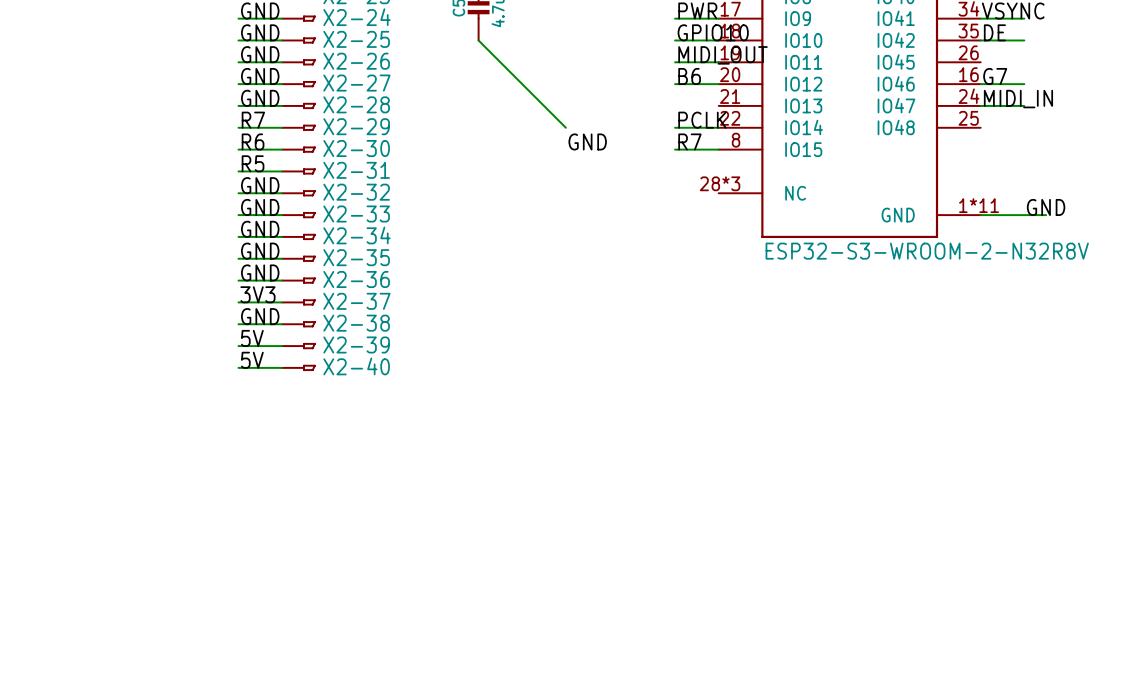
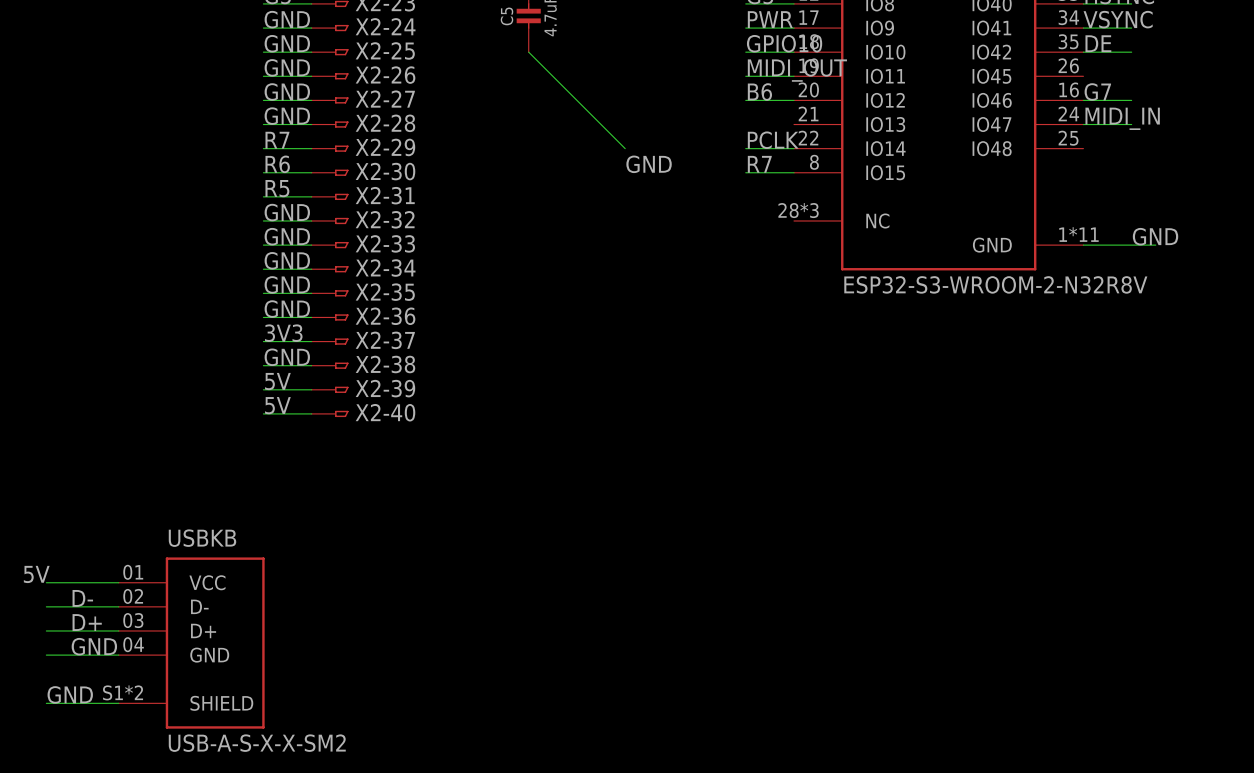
label: none -> 5V (36, 574)
wire: none -> (46, 582) (118, 582)
label: none -> D- (82, 598)
wire: none -> (46, 606) (118, 606)
label: none -> D+ (87, 622)
wire: none -> (46, 630) (118, 630)
USBKB: none -> USB-A-S-X-X-SM2 (191, 643)
label: none -> GND (94, 646)
wire: none -> (46, 655) (118, 655)
label: none -> GND (70, 694)
wire: none -> (46, 703) (118, 703)

